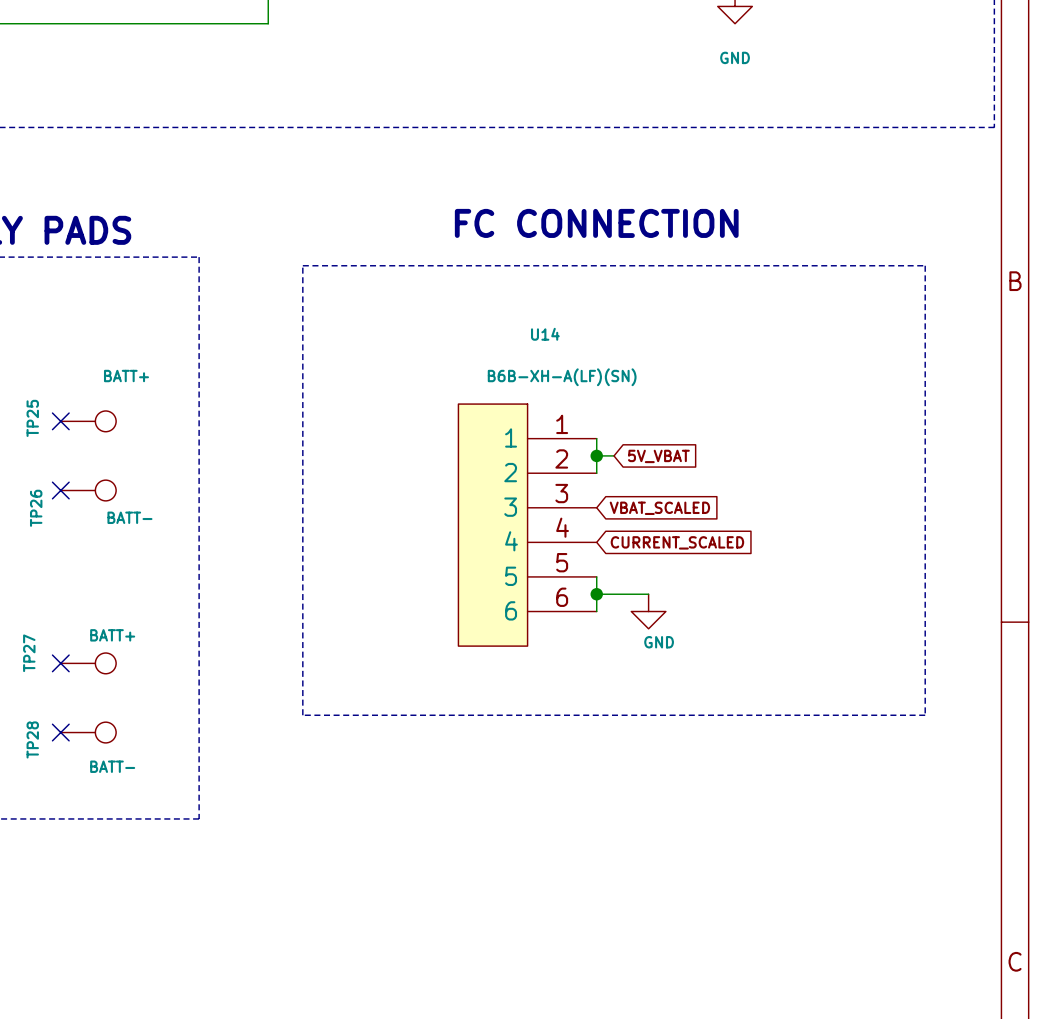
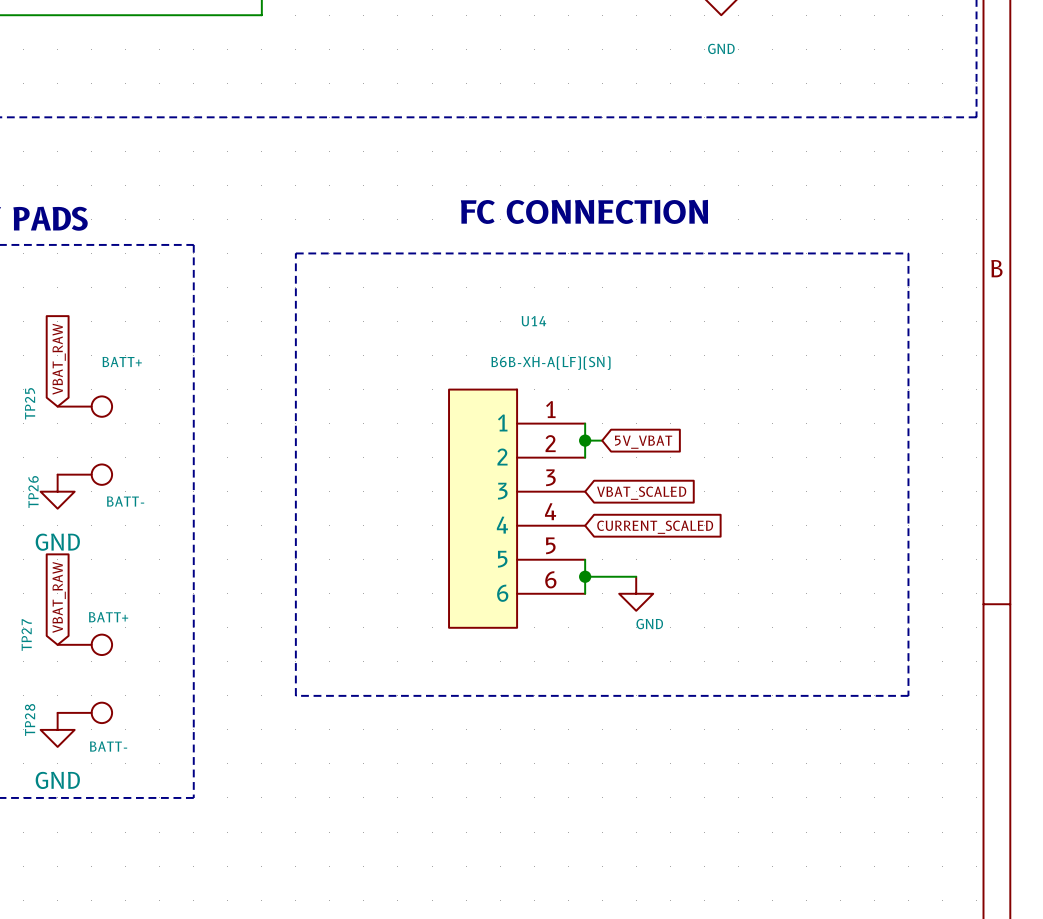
global label: none -> VBAT_RAW (59, 359)
no-connect mark: (60, 421) -> none
no-connect mark: (60, 490) -> none
power symbol: none -> GND (57, 491)
global label: none -> VBAT_RAW (59, 597)
no-connect mark: (60, 663) -> none
no-connect mark: (60, 732) -> none
power symbol: none -> GND (57, 729)

